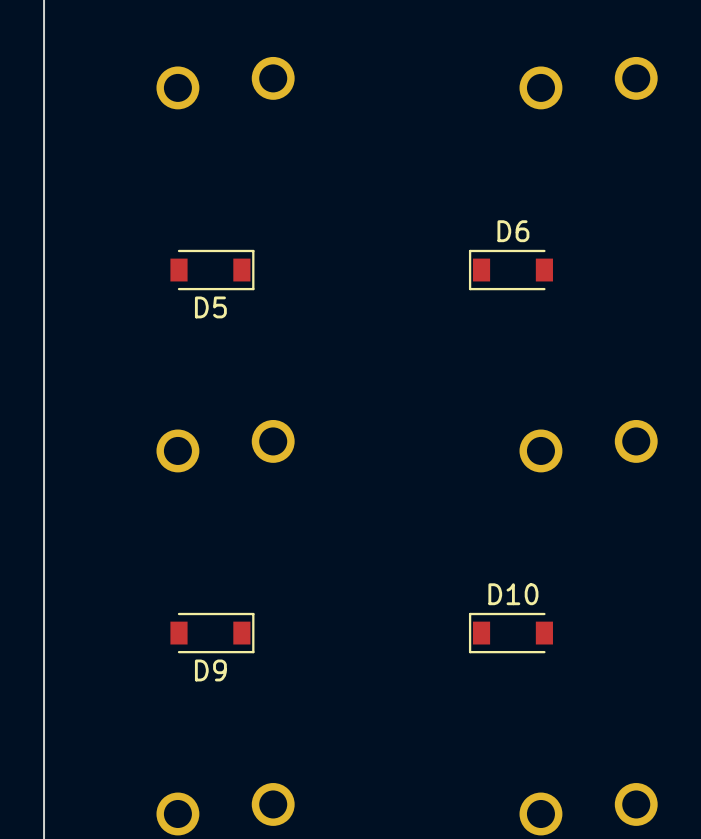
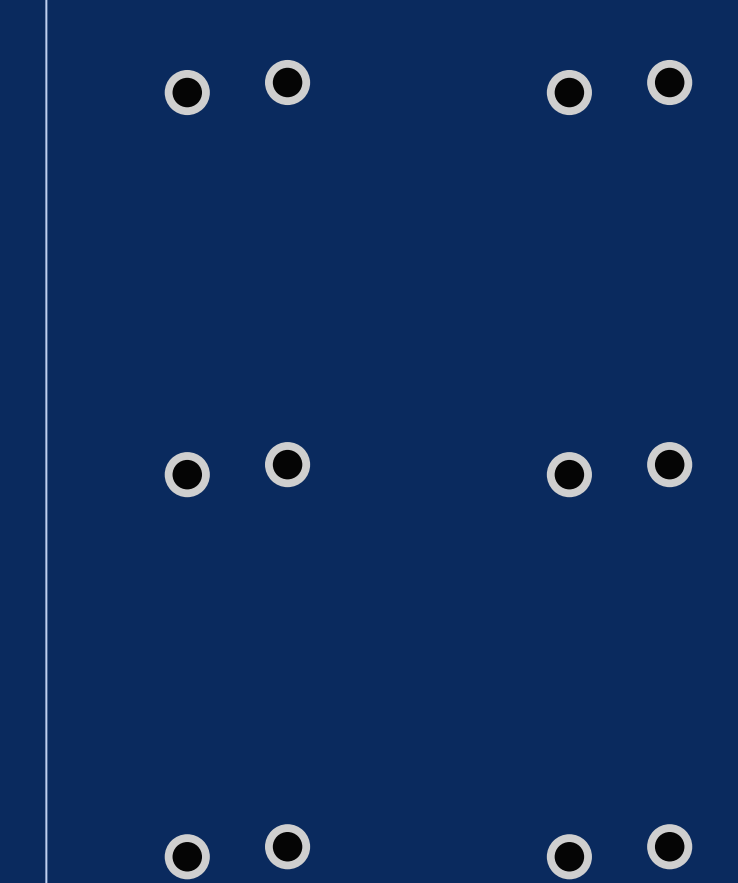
D5: (212, 270) -> none
D6: (510, 270) -> none
D9: (212, 633) -> none
D10: (510, 633) -> none

